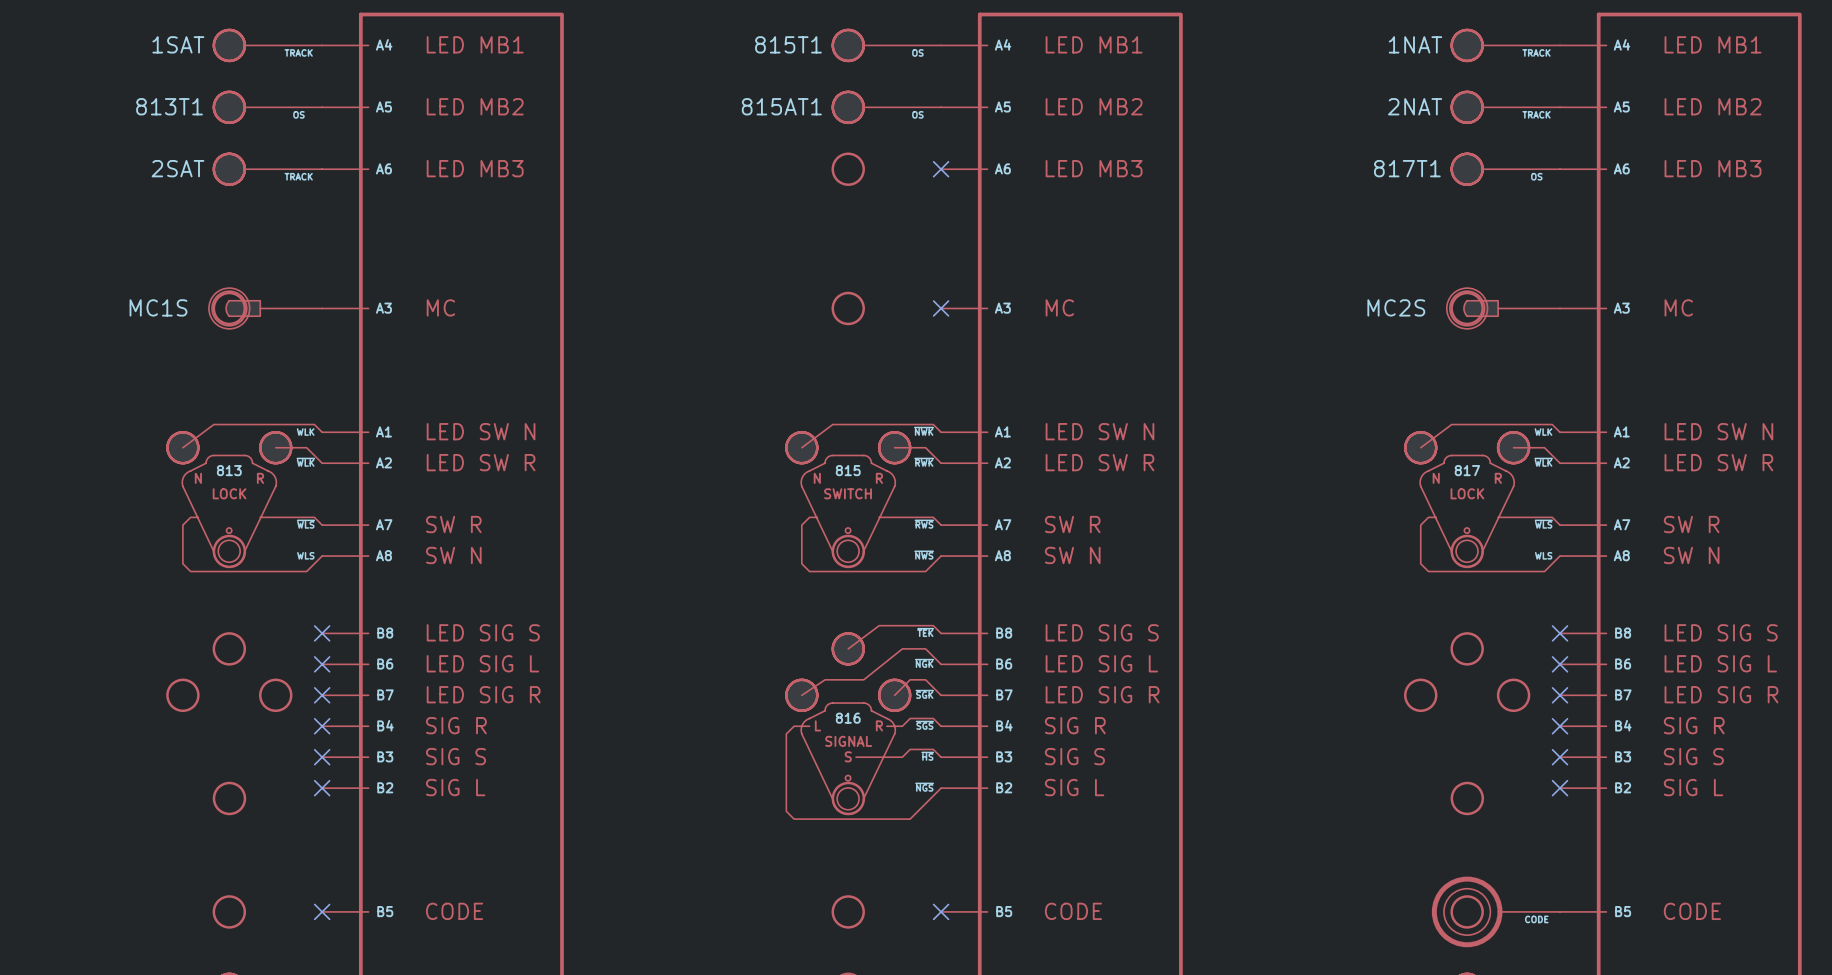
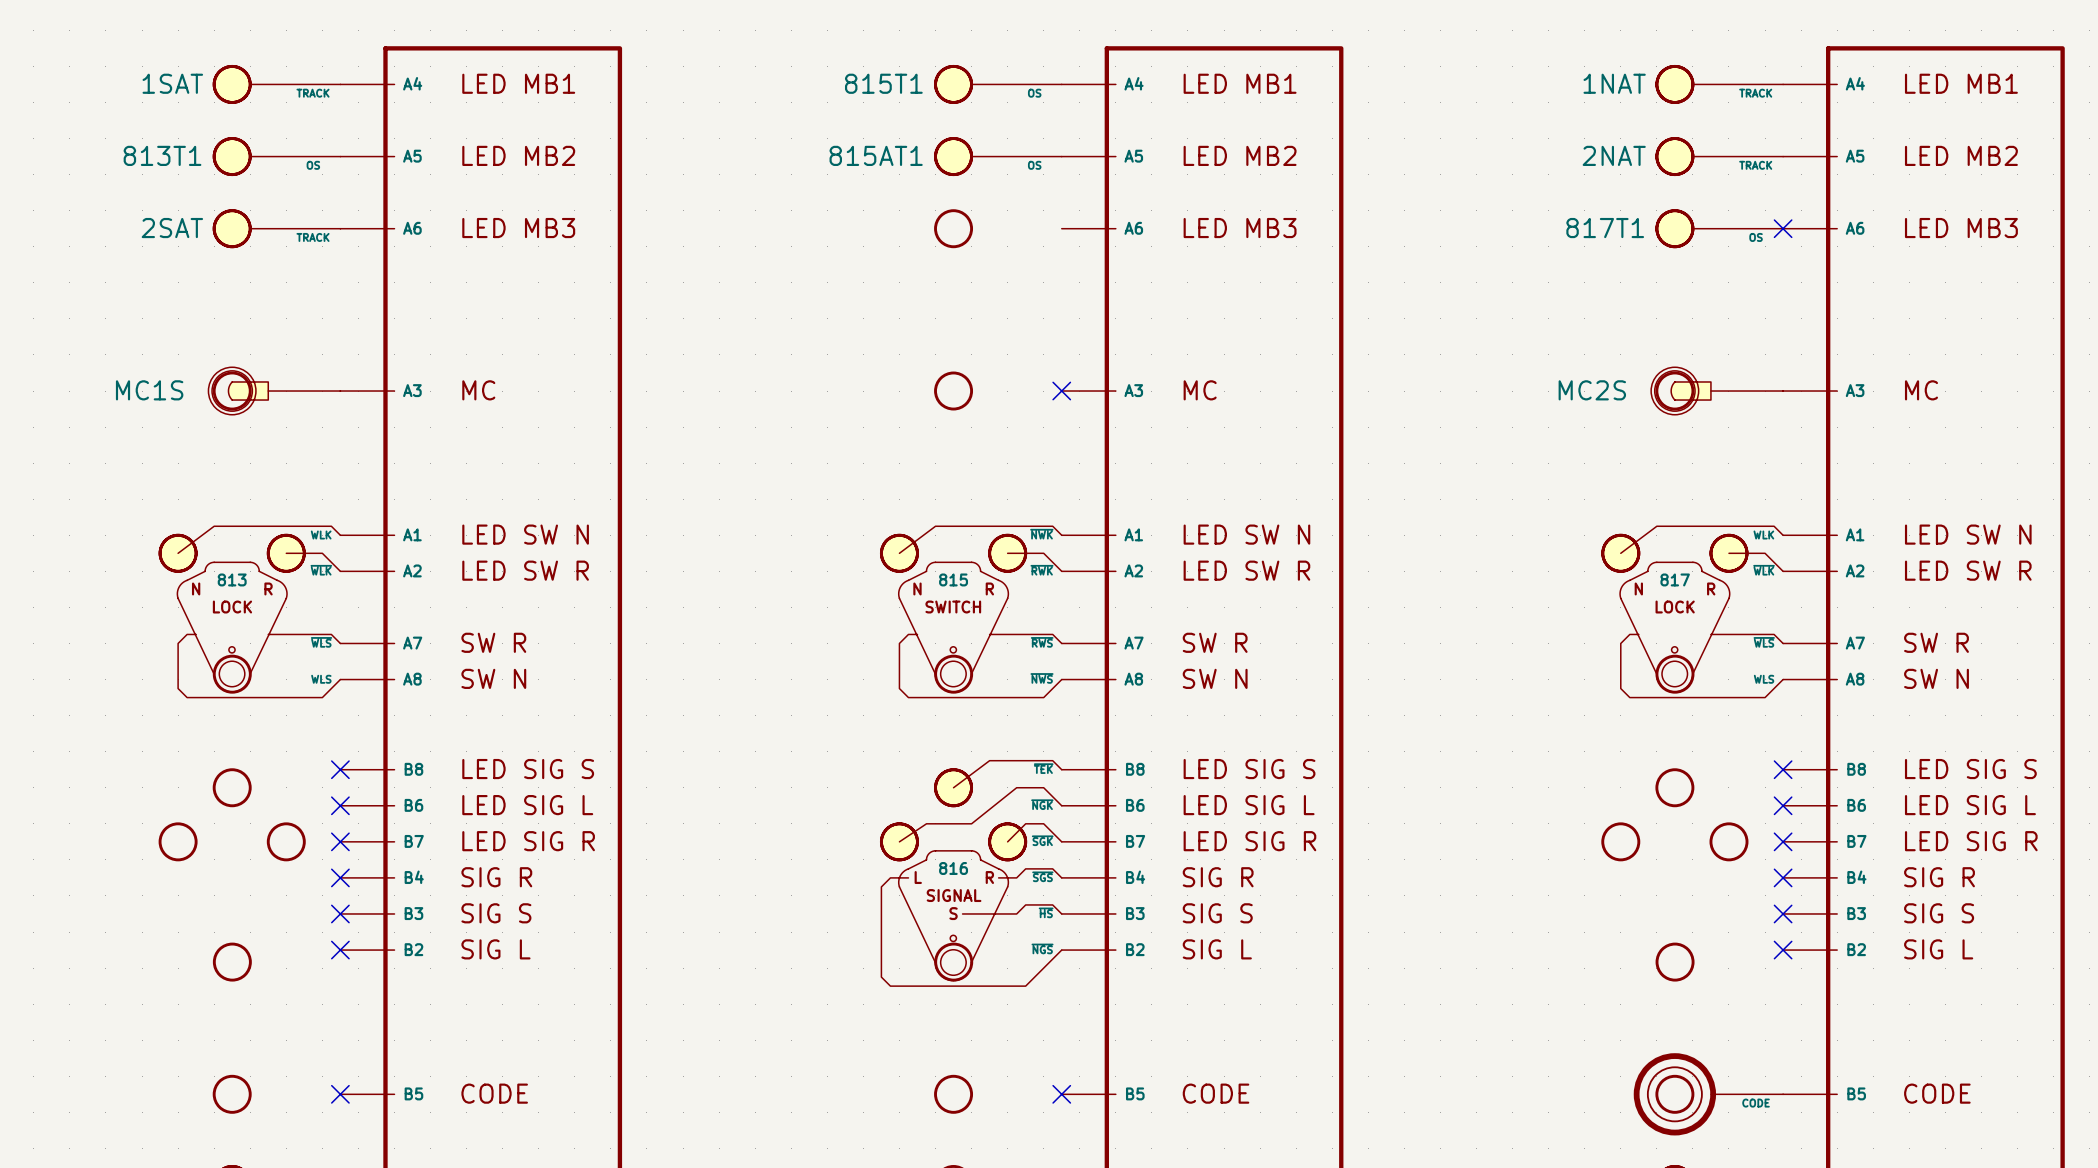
no-connect mark: (941, 169) -> none
no-connect mark: none -> (1783, 228)

